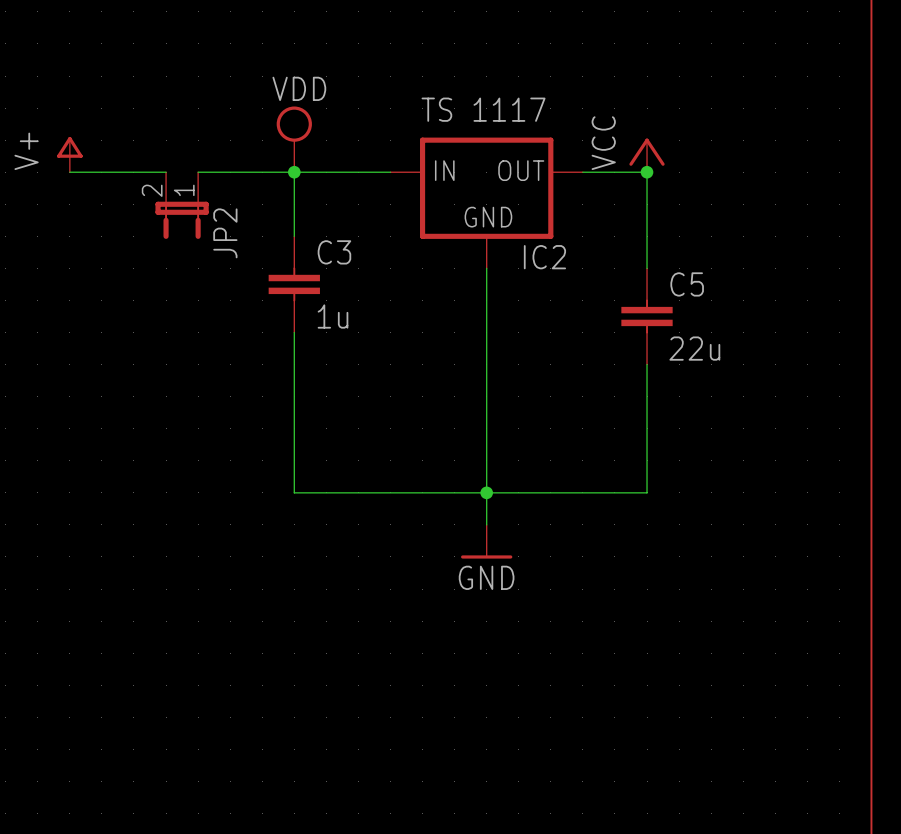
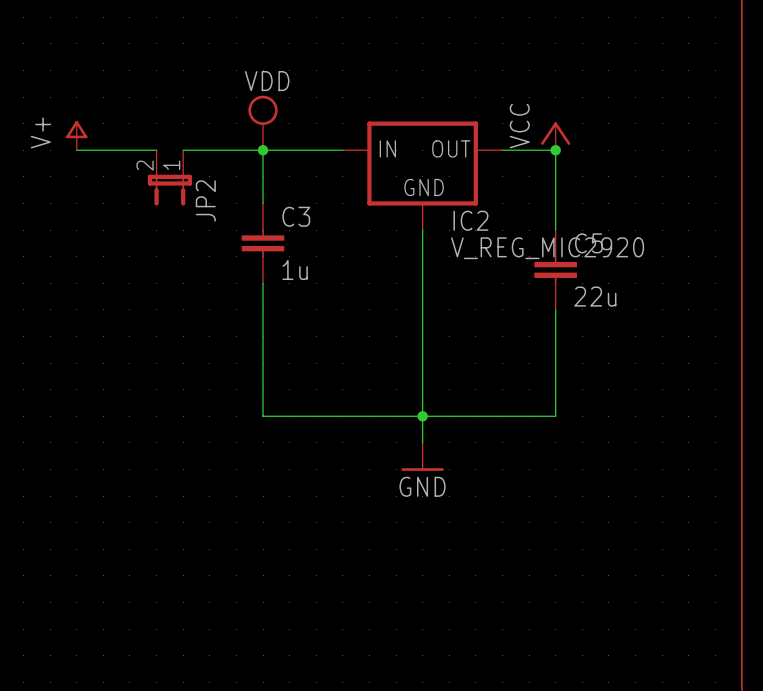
IC2 value: TS 1117 (483, 109) -> V_REG_MIC2920 (547, 248)

